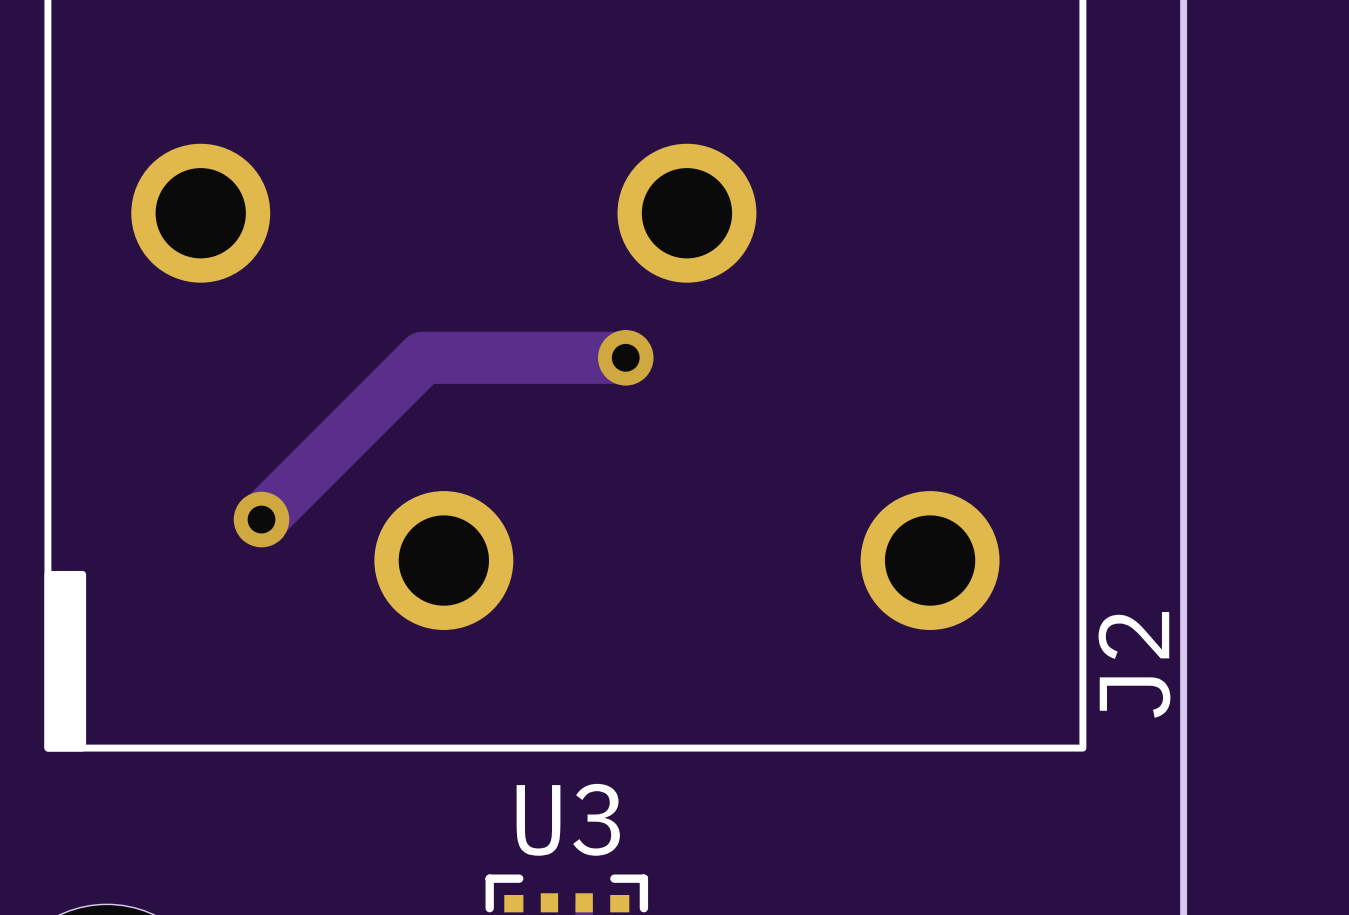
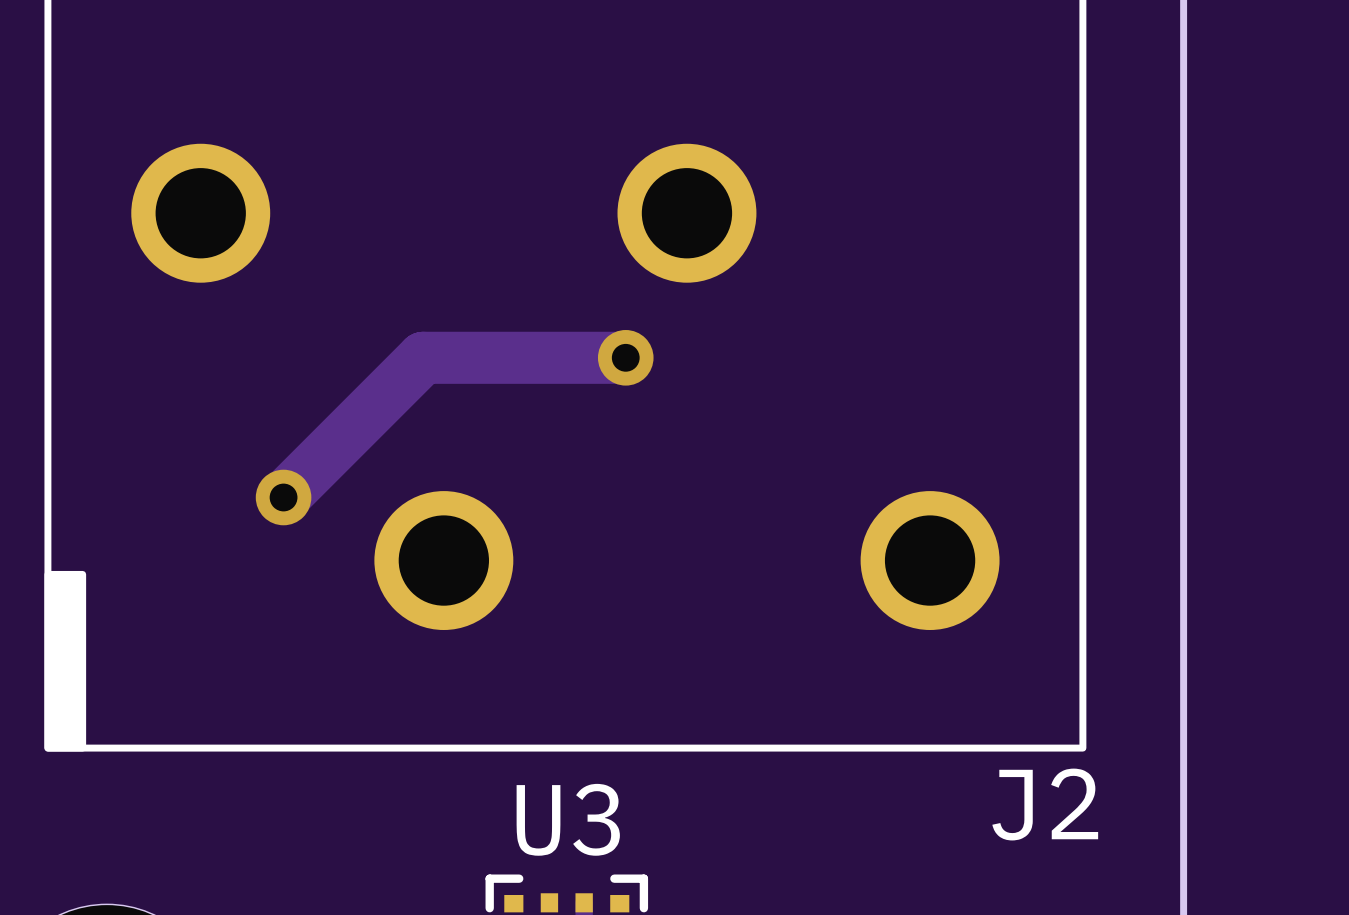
via position: (261, 519) -> (283, 497)
J2 name rotation: 0° (1134, 664) -> 90° clockwise (1045, 804)
J2 name position: J2 (1134, 664) -> J2 (1045, 804)

